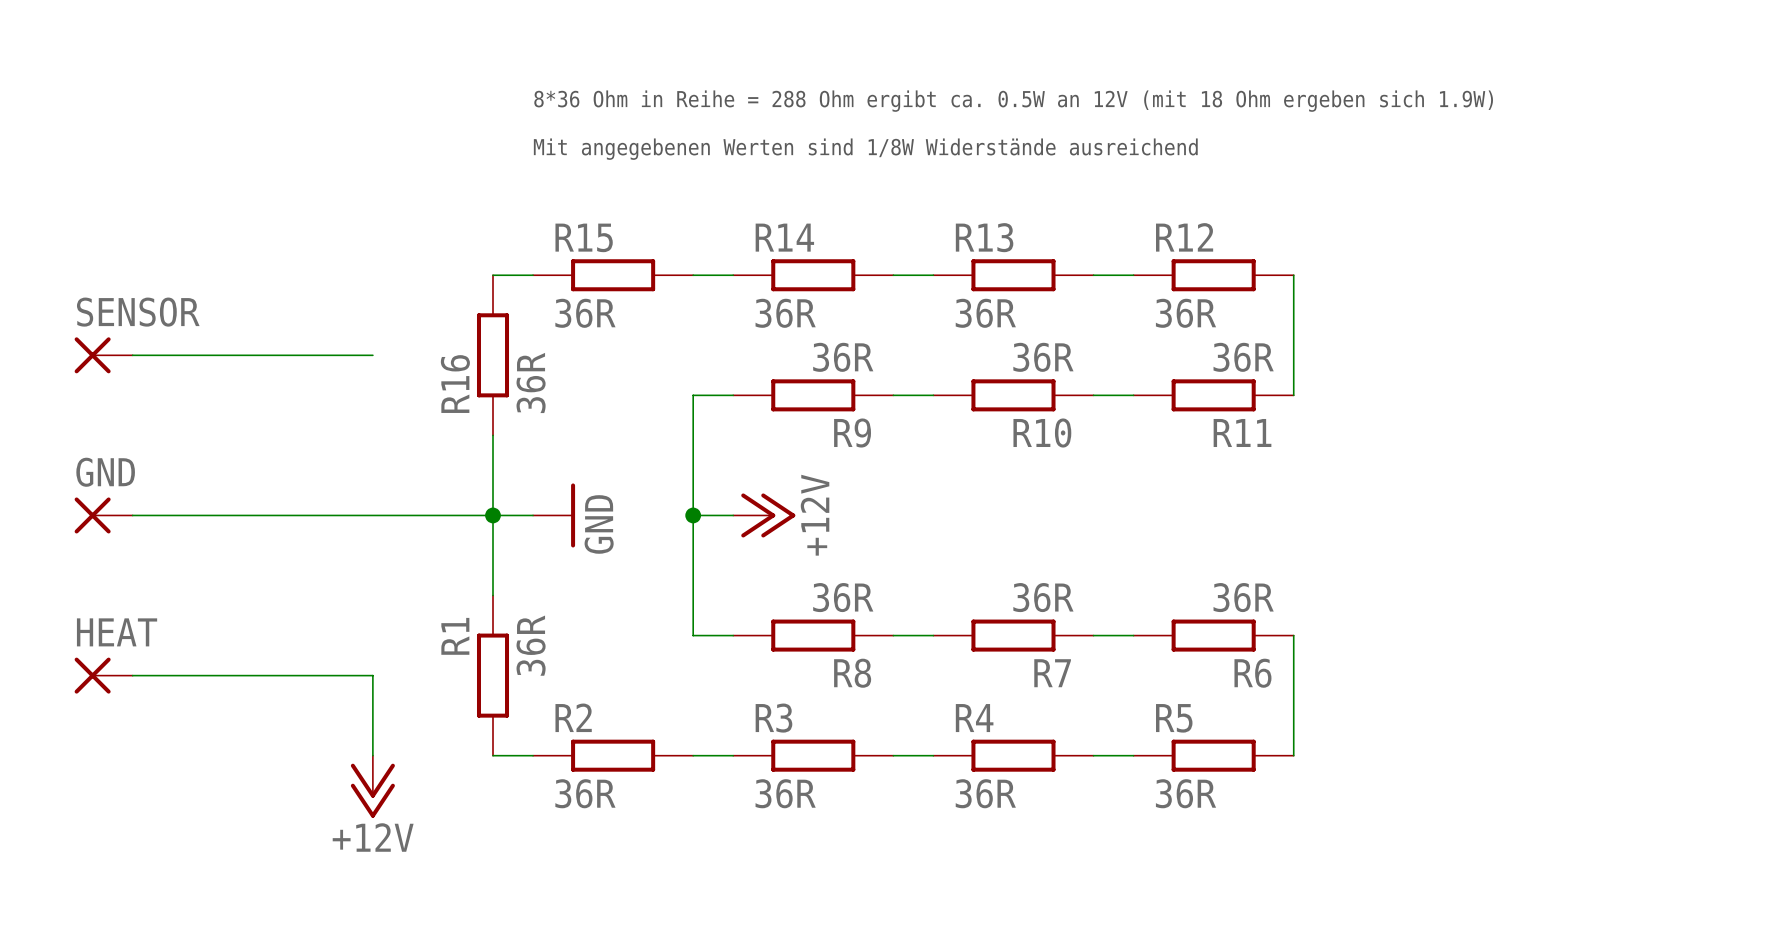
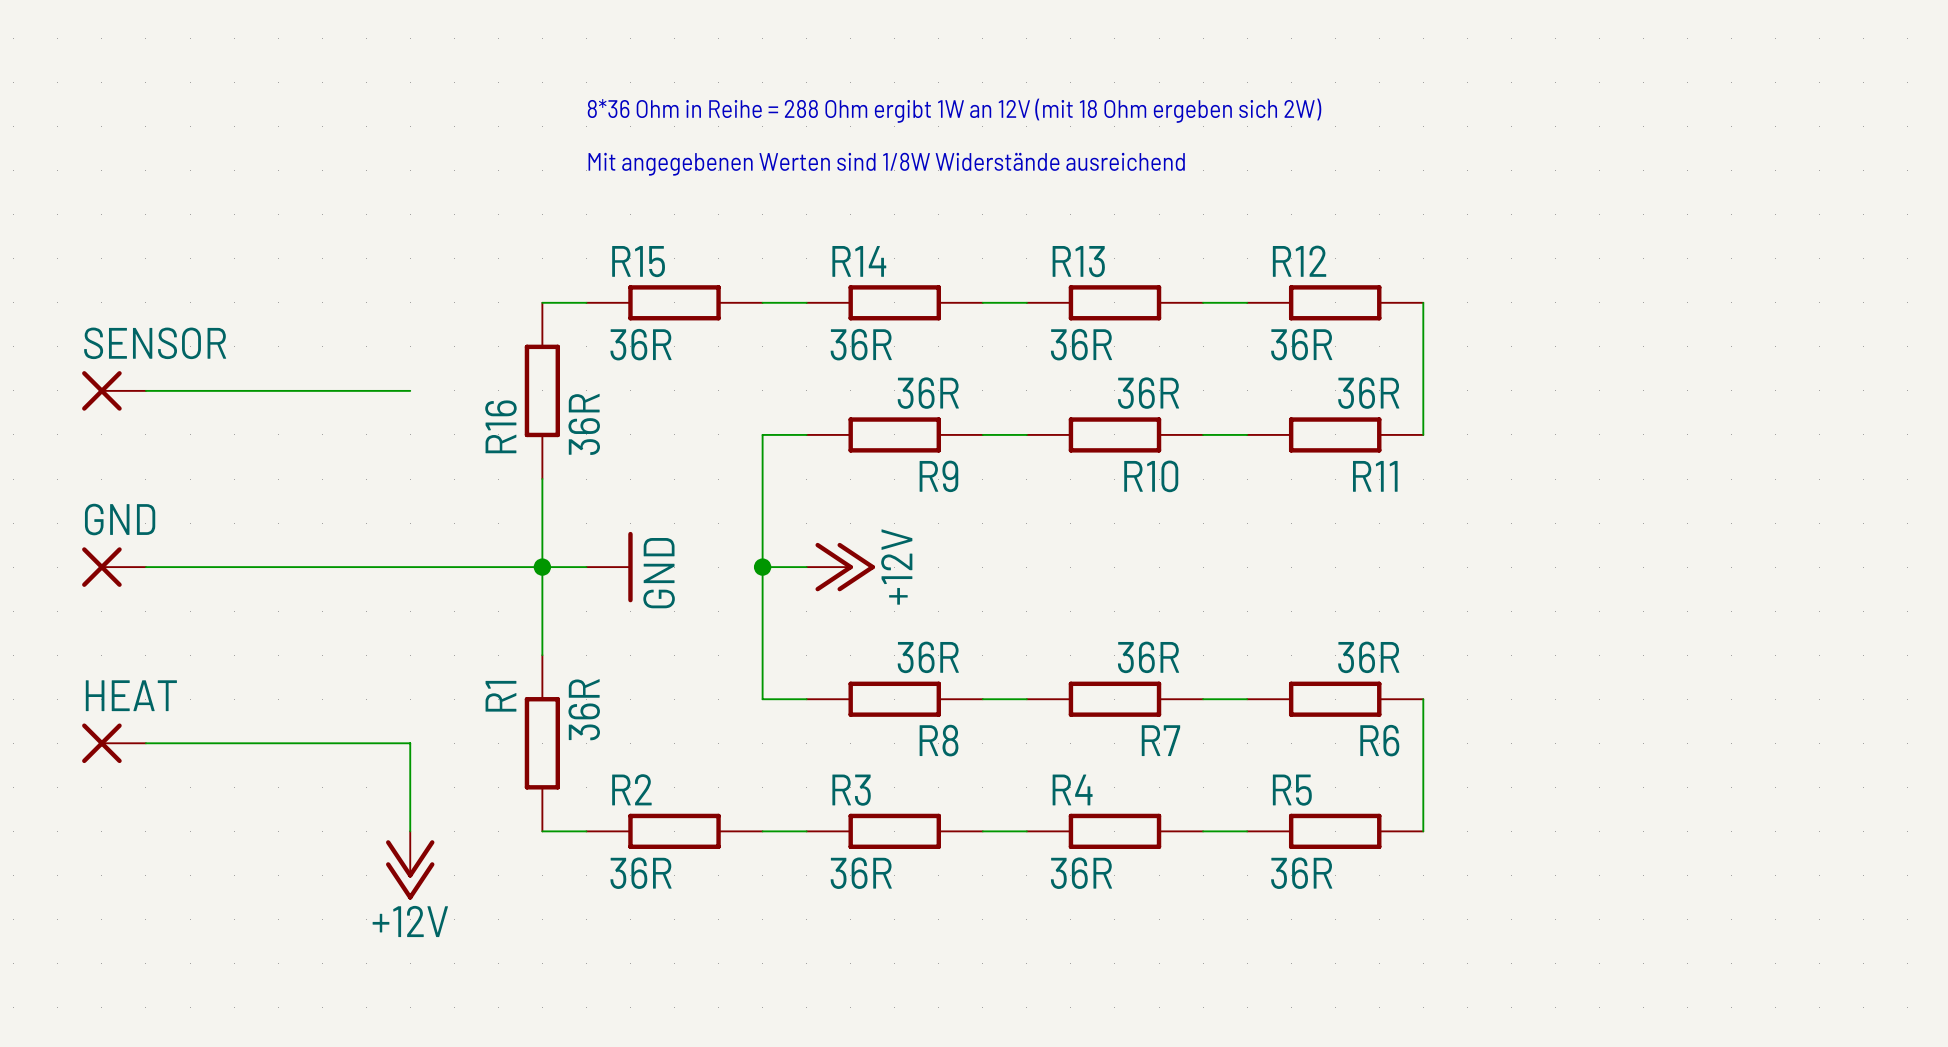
text: 8*36 Ohm in Reihe = 288 Ohm ergibt ca. 0.5W an 12V (mit 18 Ohm ergeben sich 1.9W) (1013, 101) -> 8*36 Ohm in Reihe = 288 Ohm ergibt 1W an 12V (mit 18 Ohm ergeben sich 2W) (954, 110)

